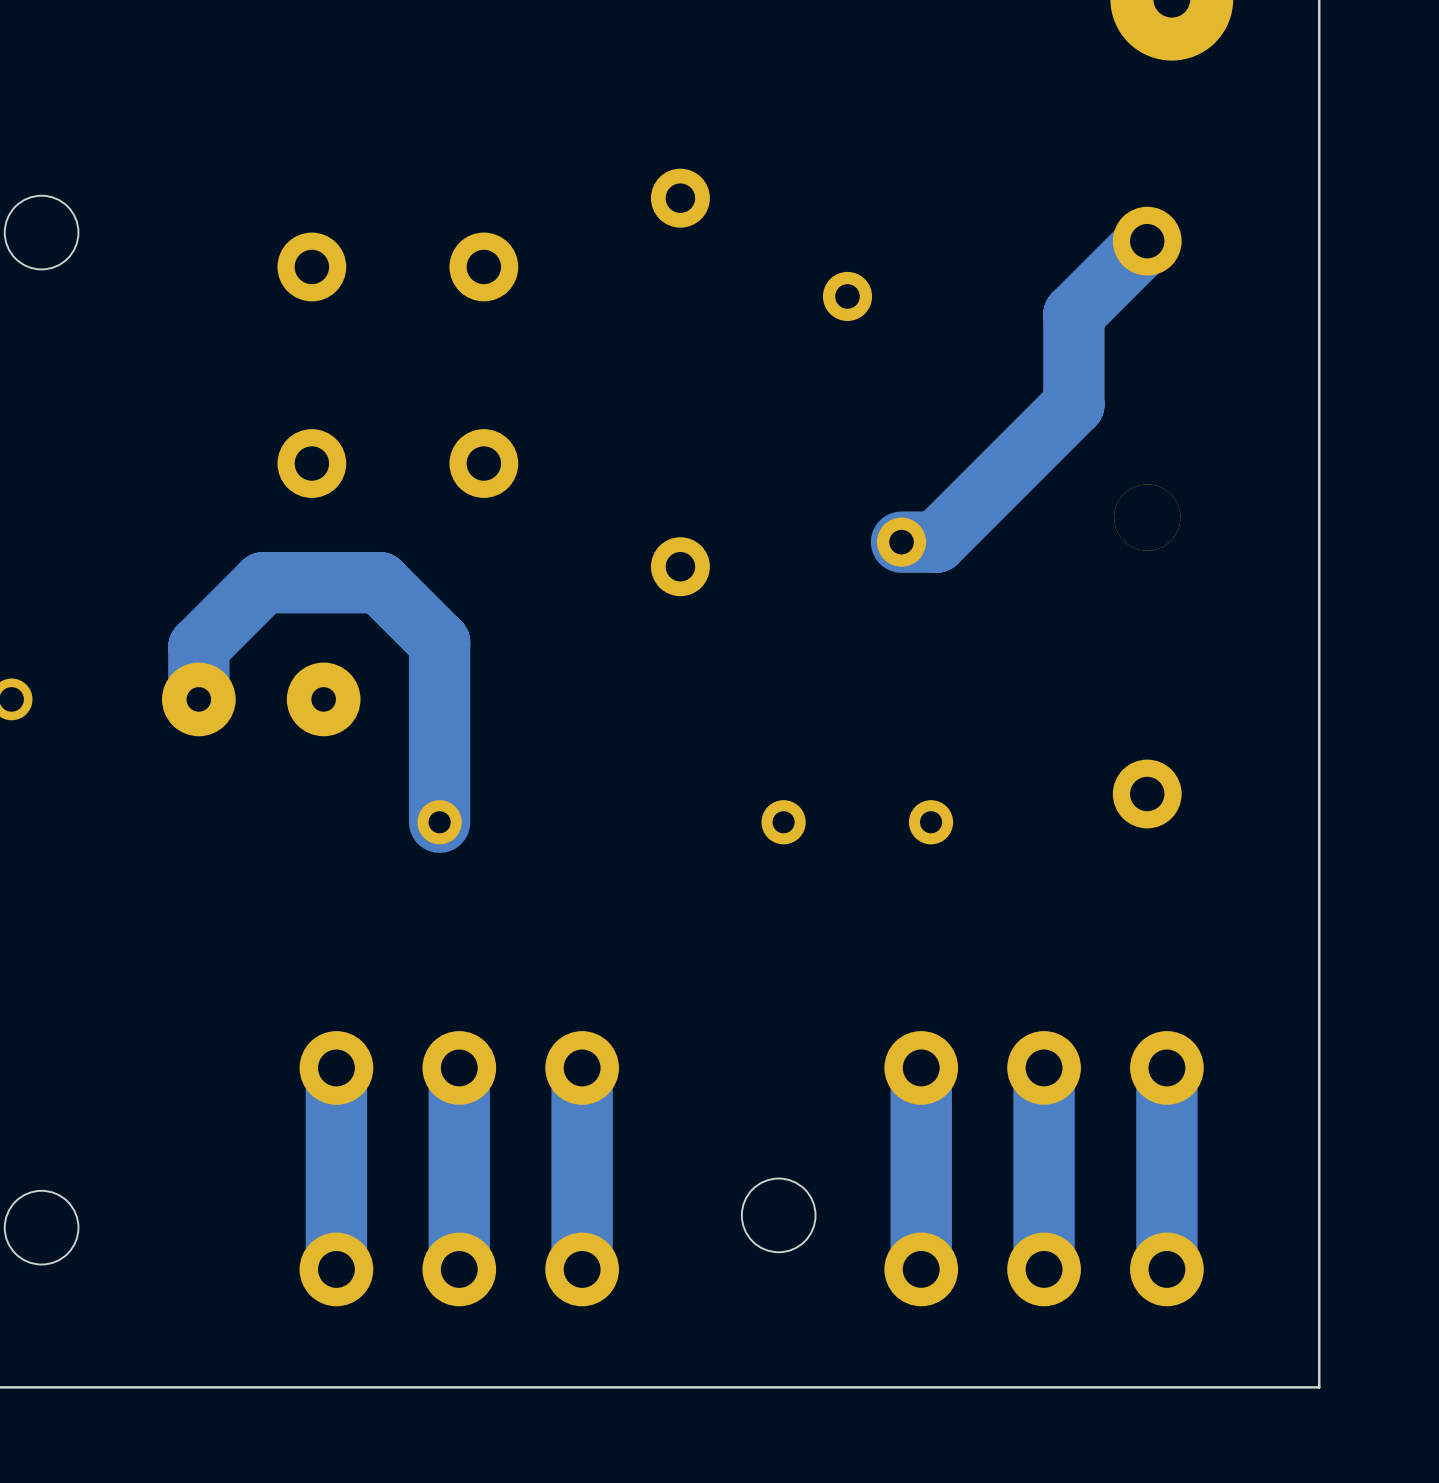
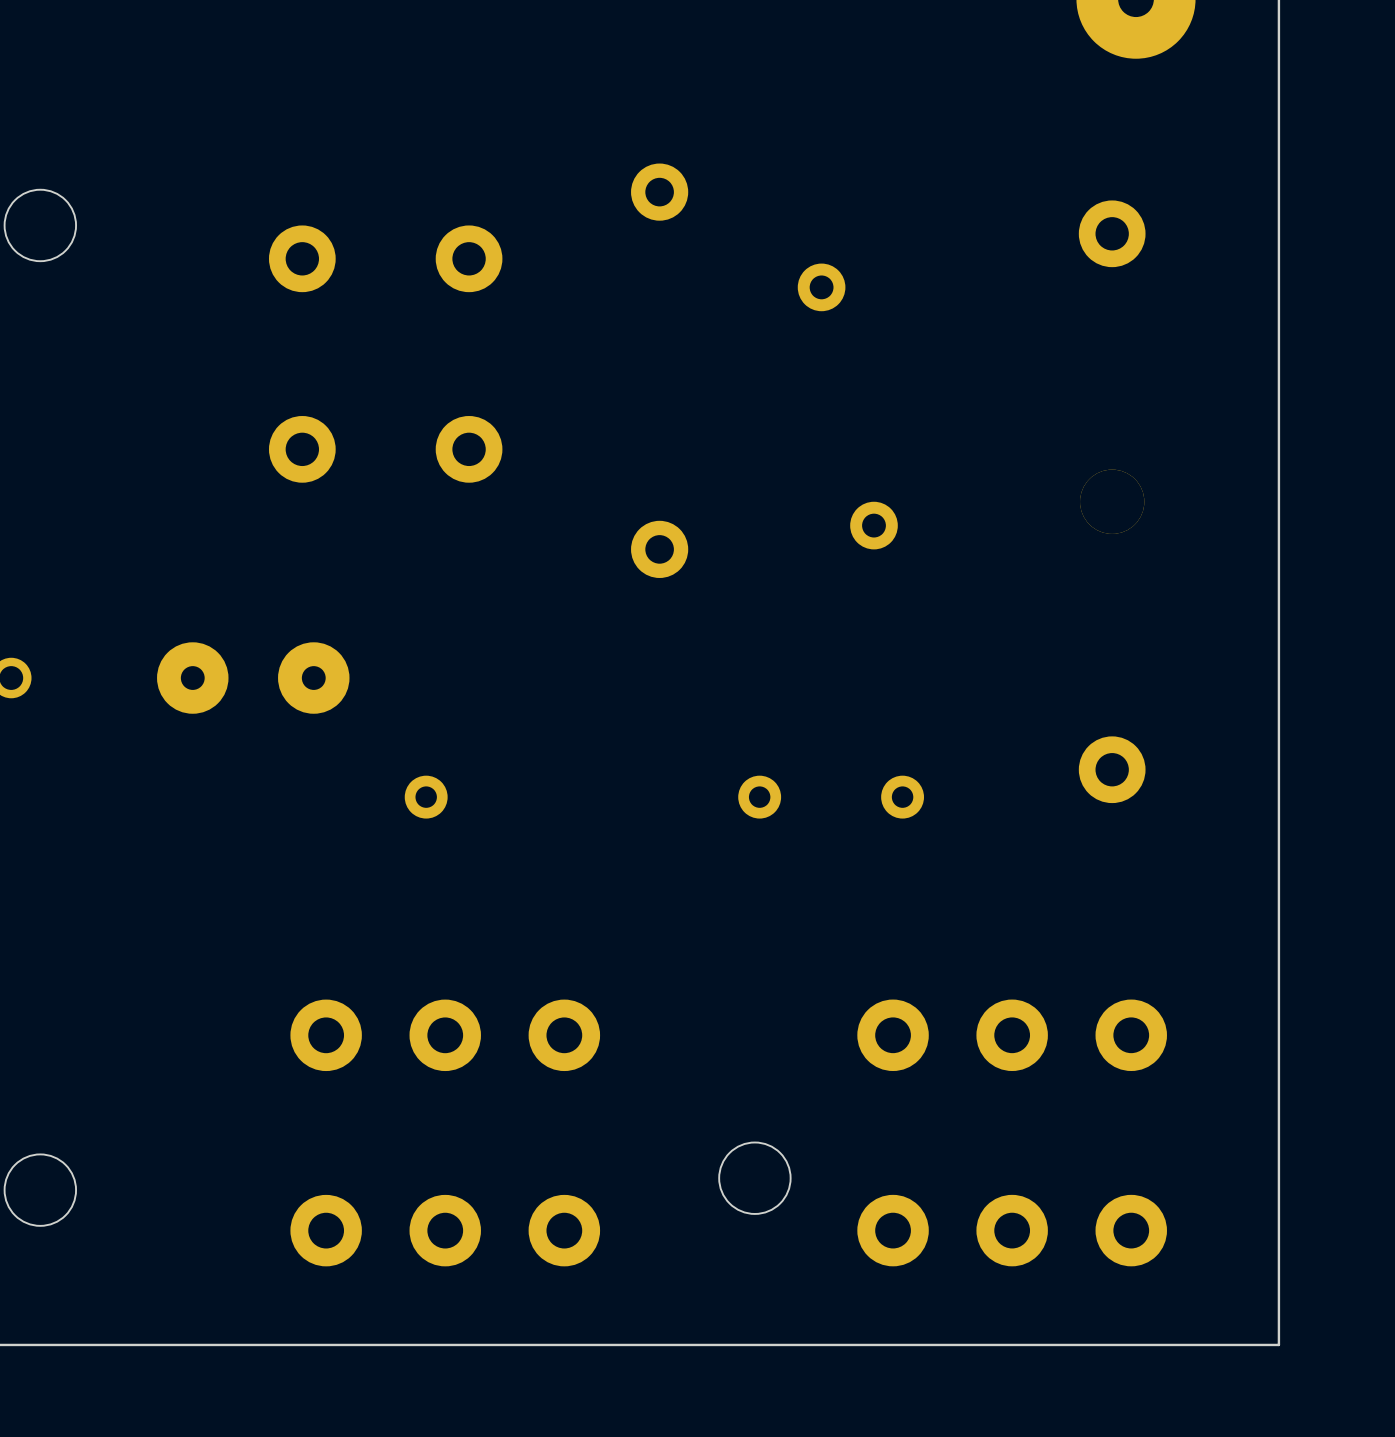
track: (1147, 241) (1073, 314) (1073, 404) (936, 542) (901, 542) -> none
track: (198, 699) (198, 647) (263, 582) (379, 582) (439, 642) (439, 822) -> none
track: (336, 1067) (336, 1269) -> none
track: (459, 1067) (459, 1269) -> none
track: (582, 1067) (582, 1269) -> none
track: (921, 1067) (921, 1269) -> none
track: (1044, 1067) (1044, 1269) -> none
track: (1166, 1067) (1166, 1269) -> none

